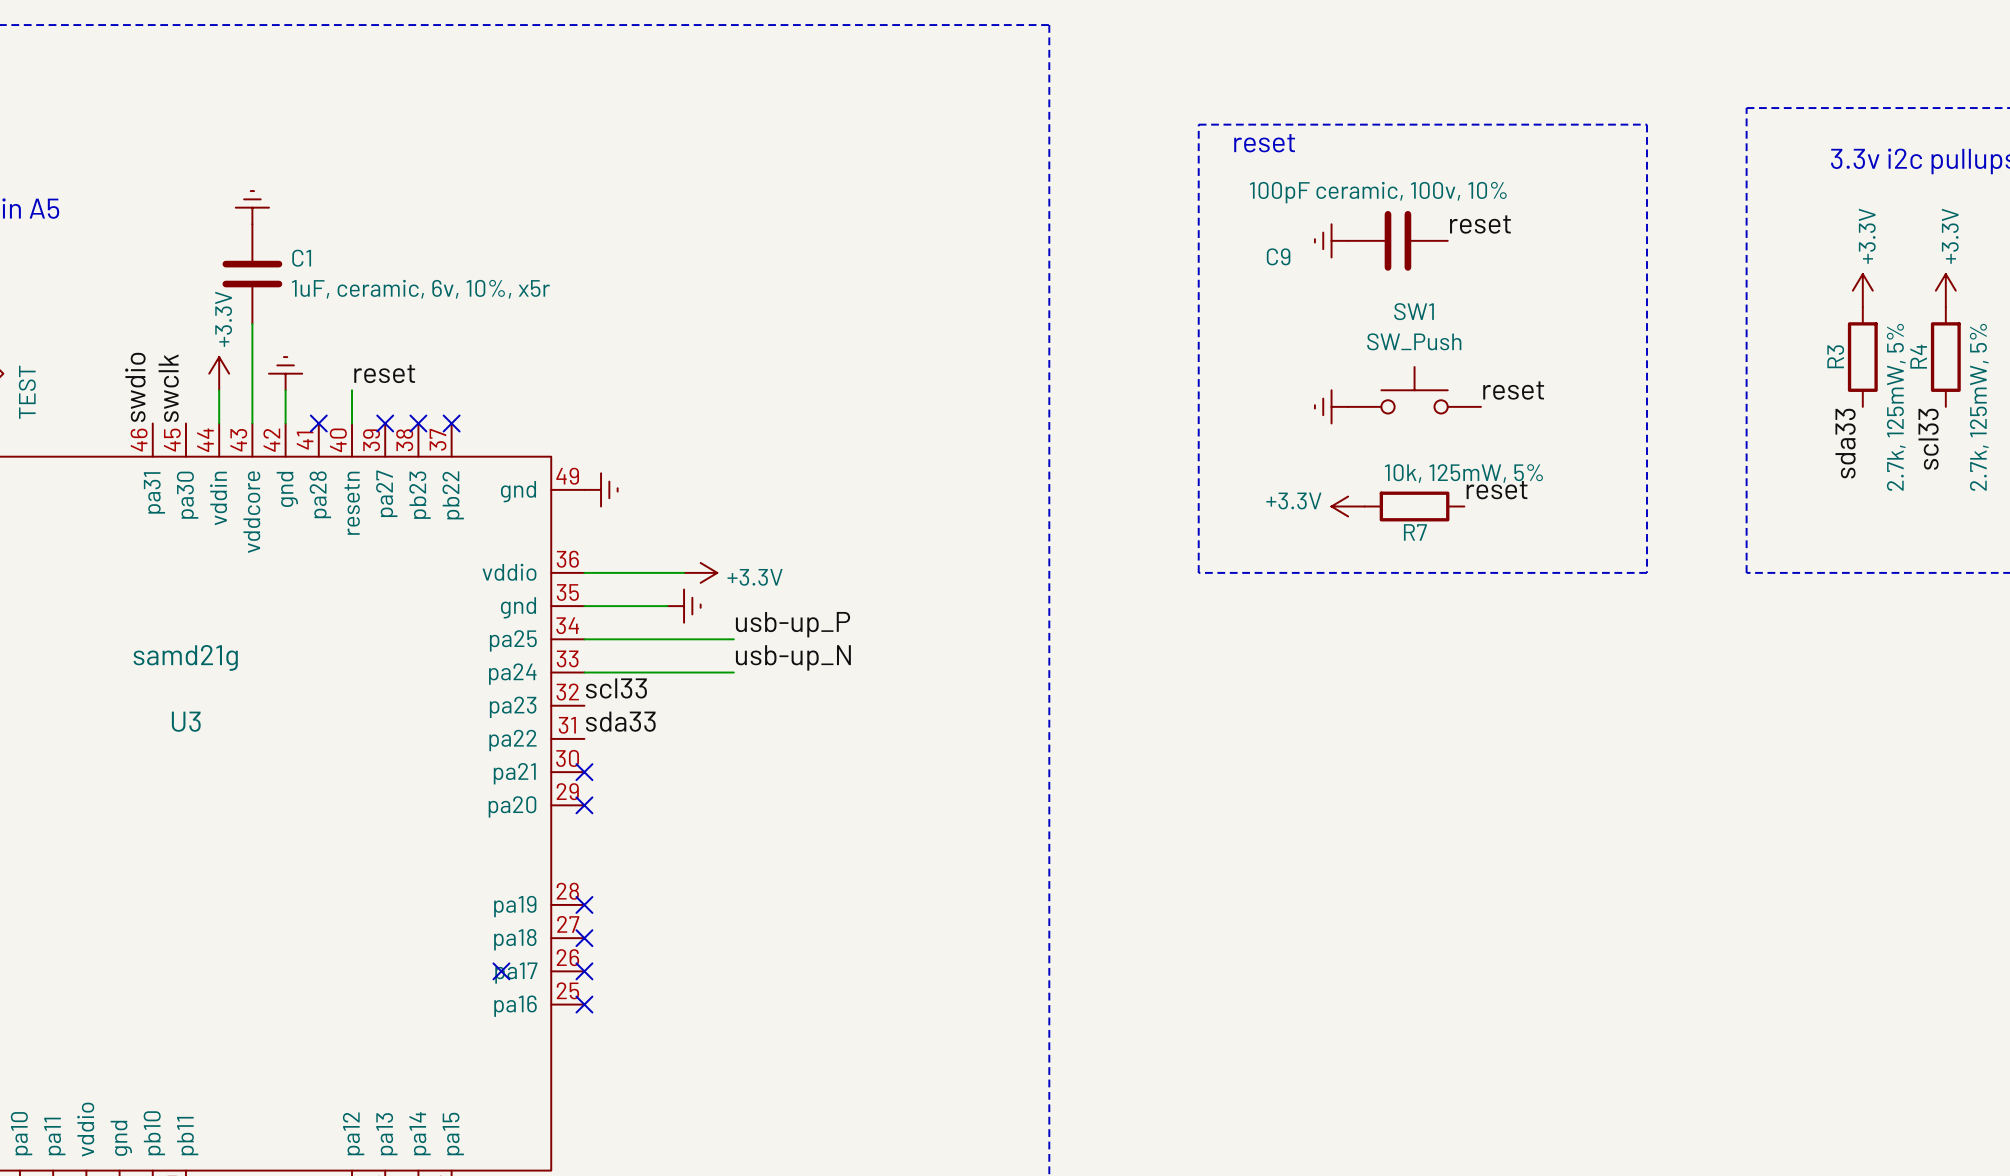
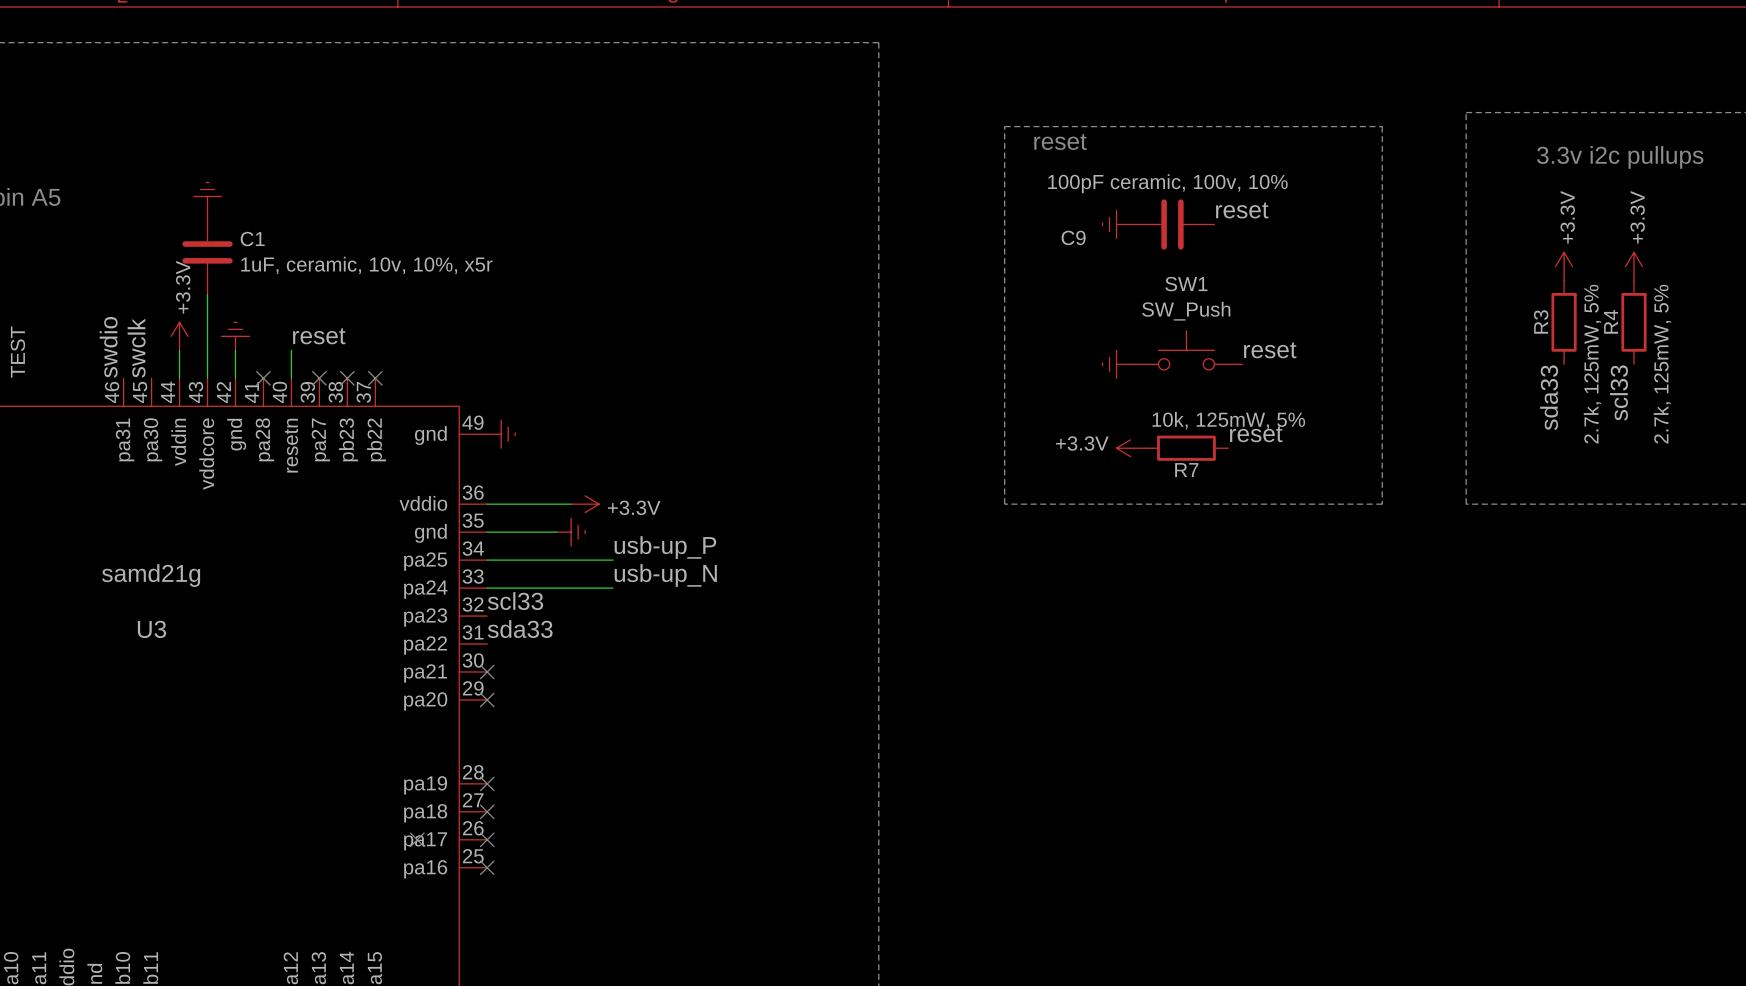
C1 value: 1uF, ceramic, 6v, 10%, x5r (420, 289) -> 1uF, ceramic, 10v, 10%, x5r (366, 265)

